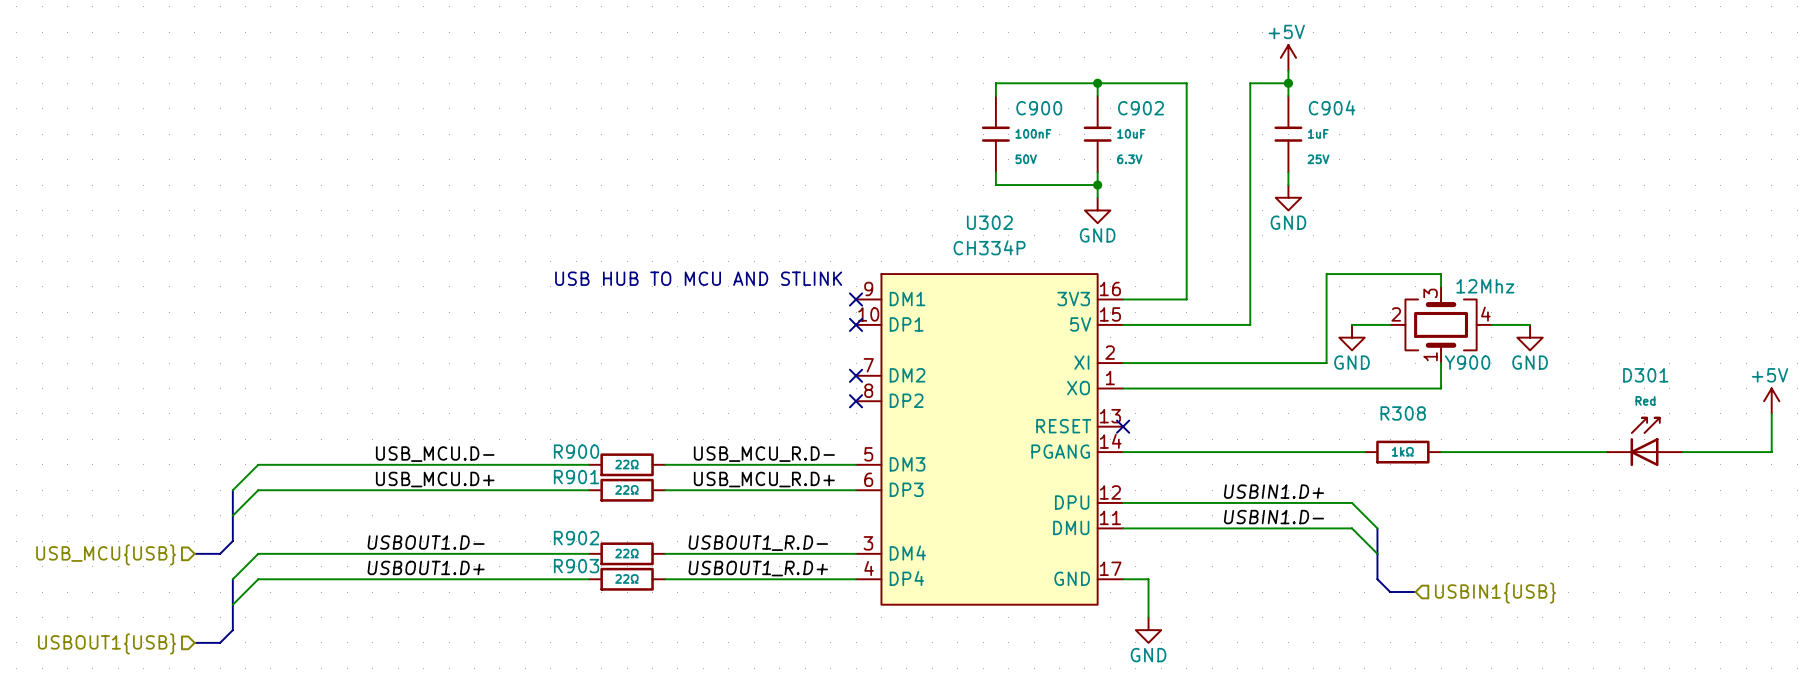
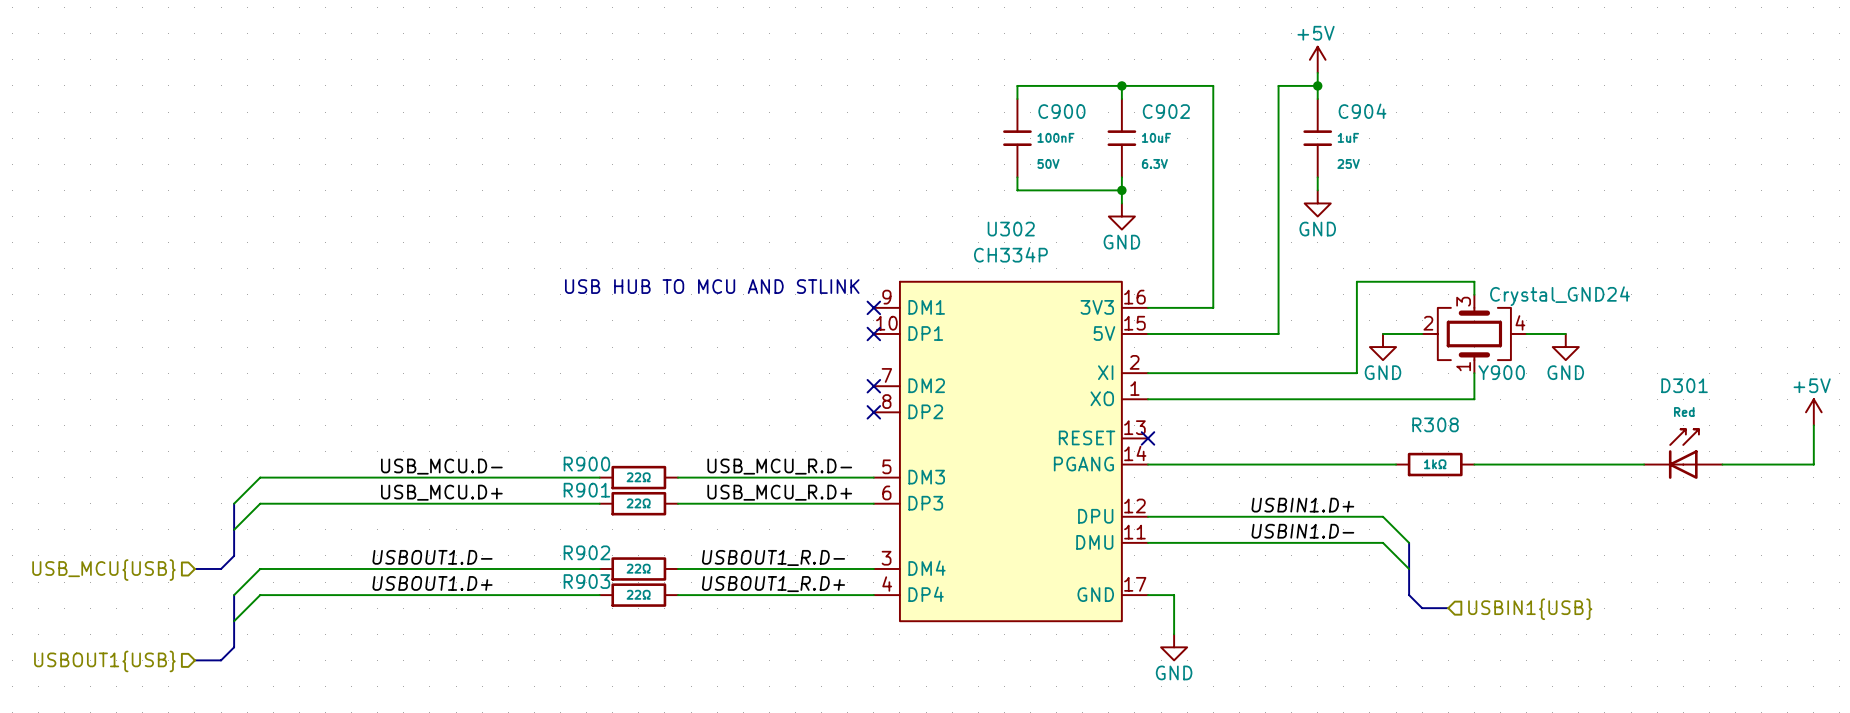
Y900 value: 12Mhz (1485, 286) -> Crystal_GND24 (1559, 296)

